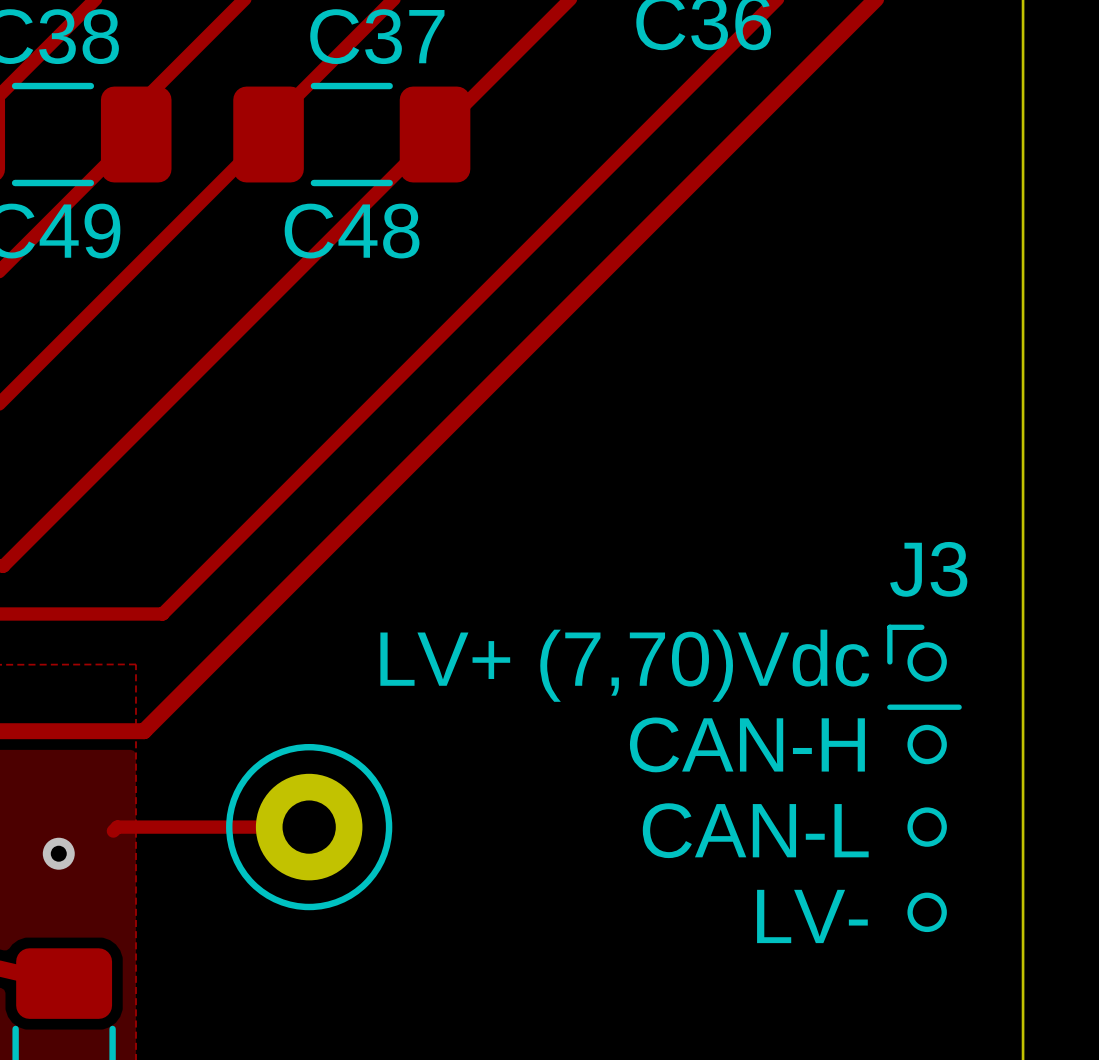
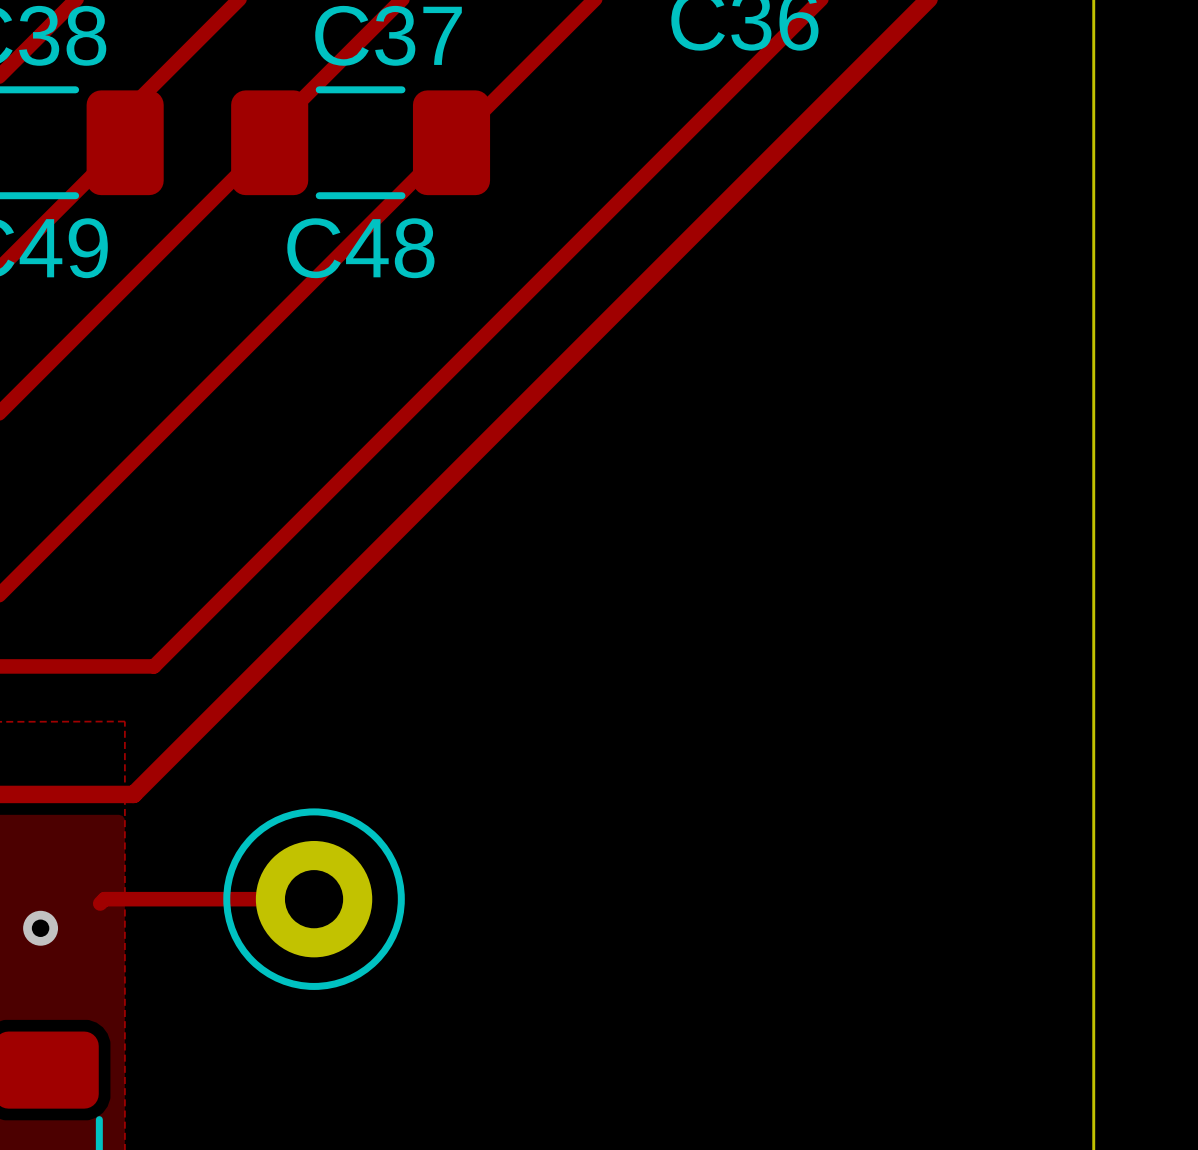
text: J3 (928, 569) -> none
line: (921, 627) (889, 627) (889, 661) -> none
drawing: [907, 642, 947, 933] -> none
text: LV+ (7,70)Vdc (624, 665) -> none
line: (889, 707) (959, 707) -> none
text: CAN-H (747, 744) -> none
text: CAN-L (755, 830) -> none
text: LV- (812, 916) -> none

